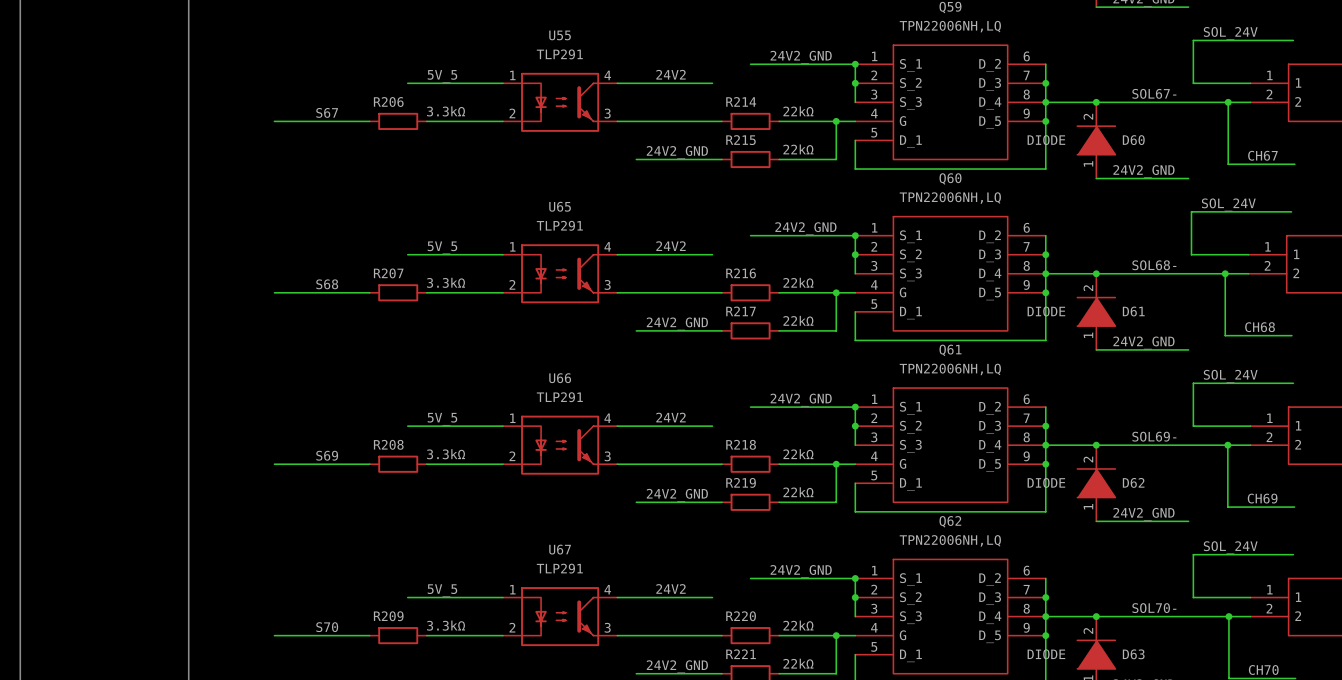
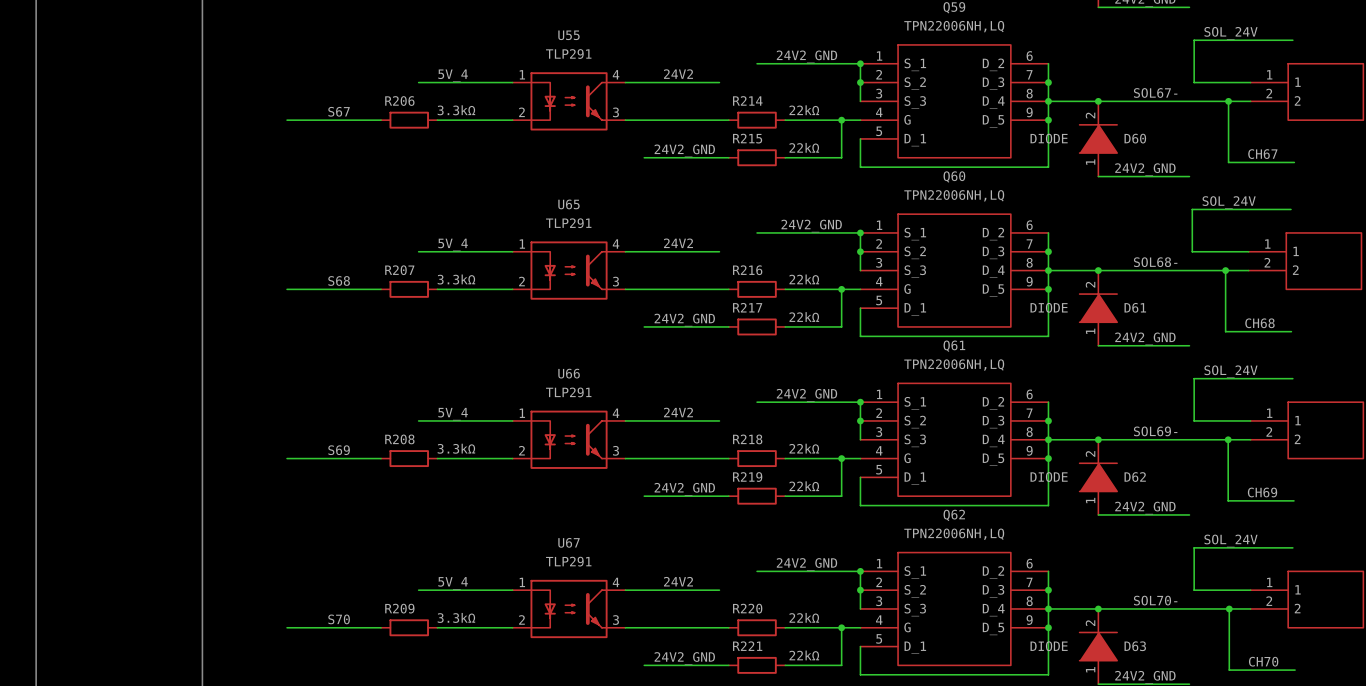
label: 5V_5 (442, 76) -> 5V_4 (453, 75)
label: 5V_5 (442, 247) -> 5V_4 (453, 244)
label: 5V_5 (442, 419) -> 5V_4 (453, 414)
label: 5V_5 (442, 590) -> 5V_4 (453, 583)

